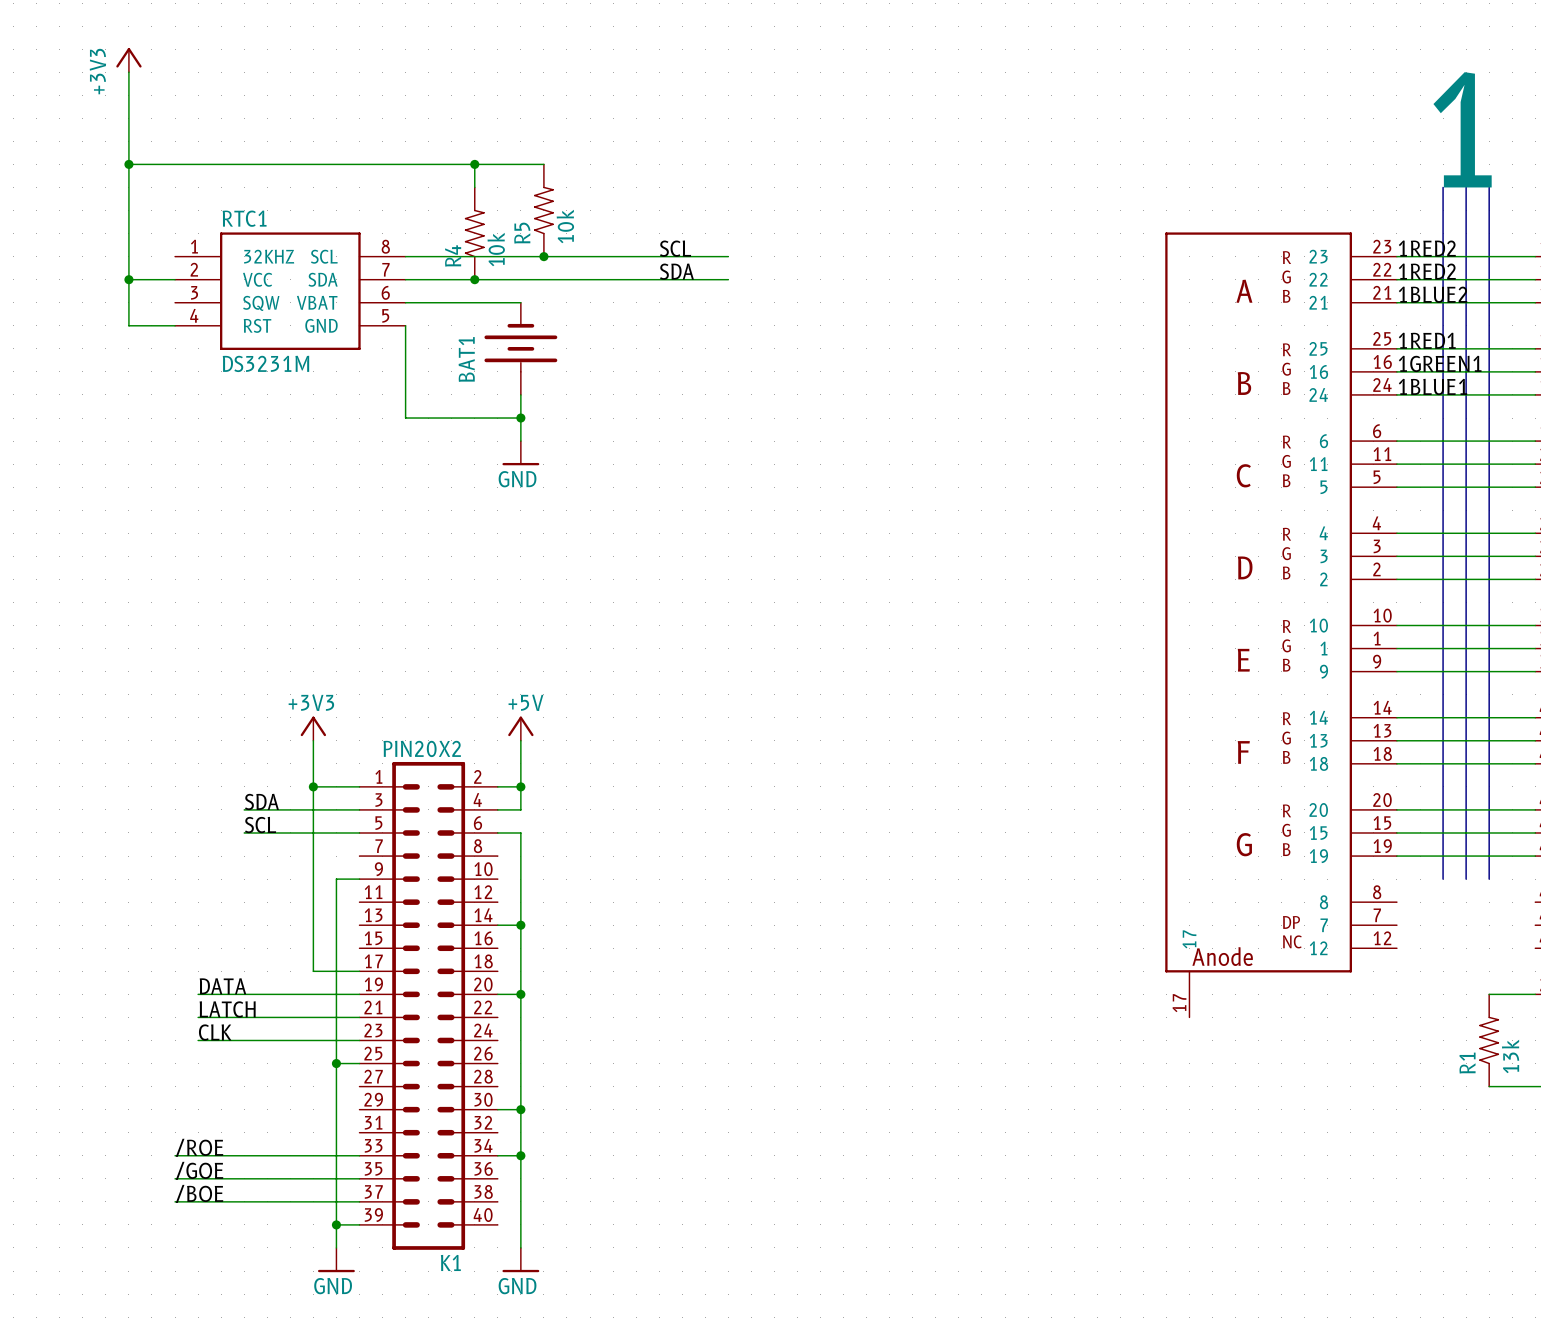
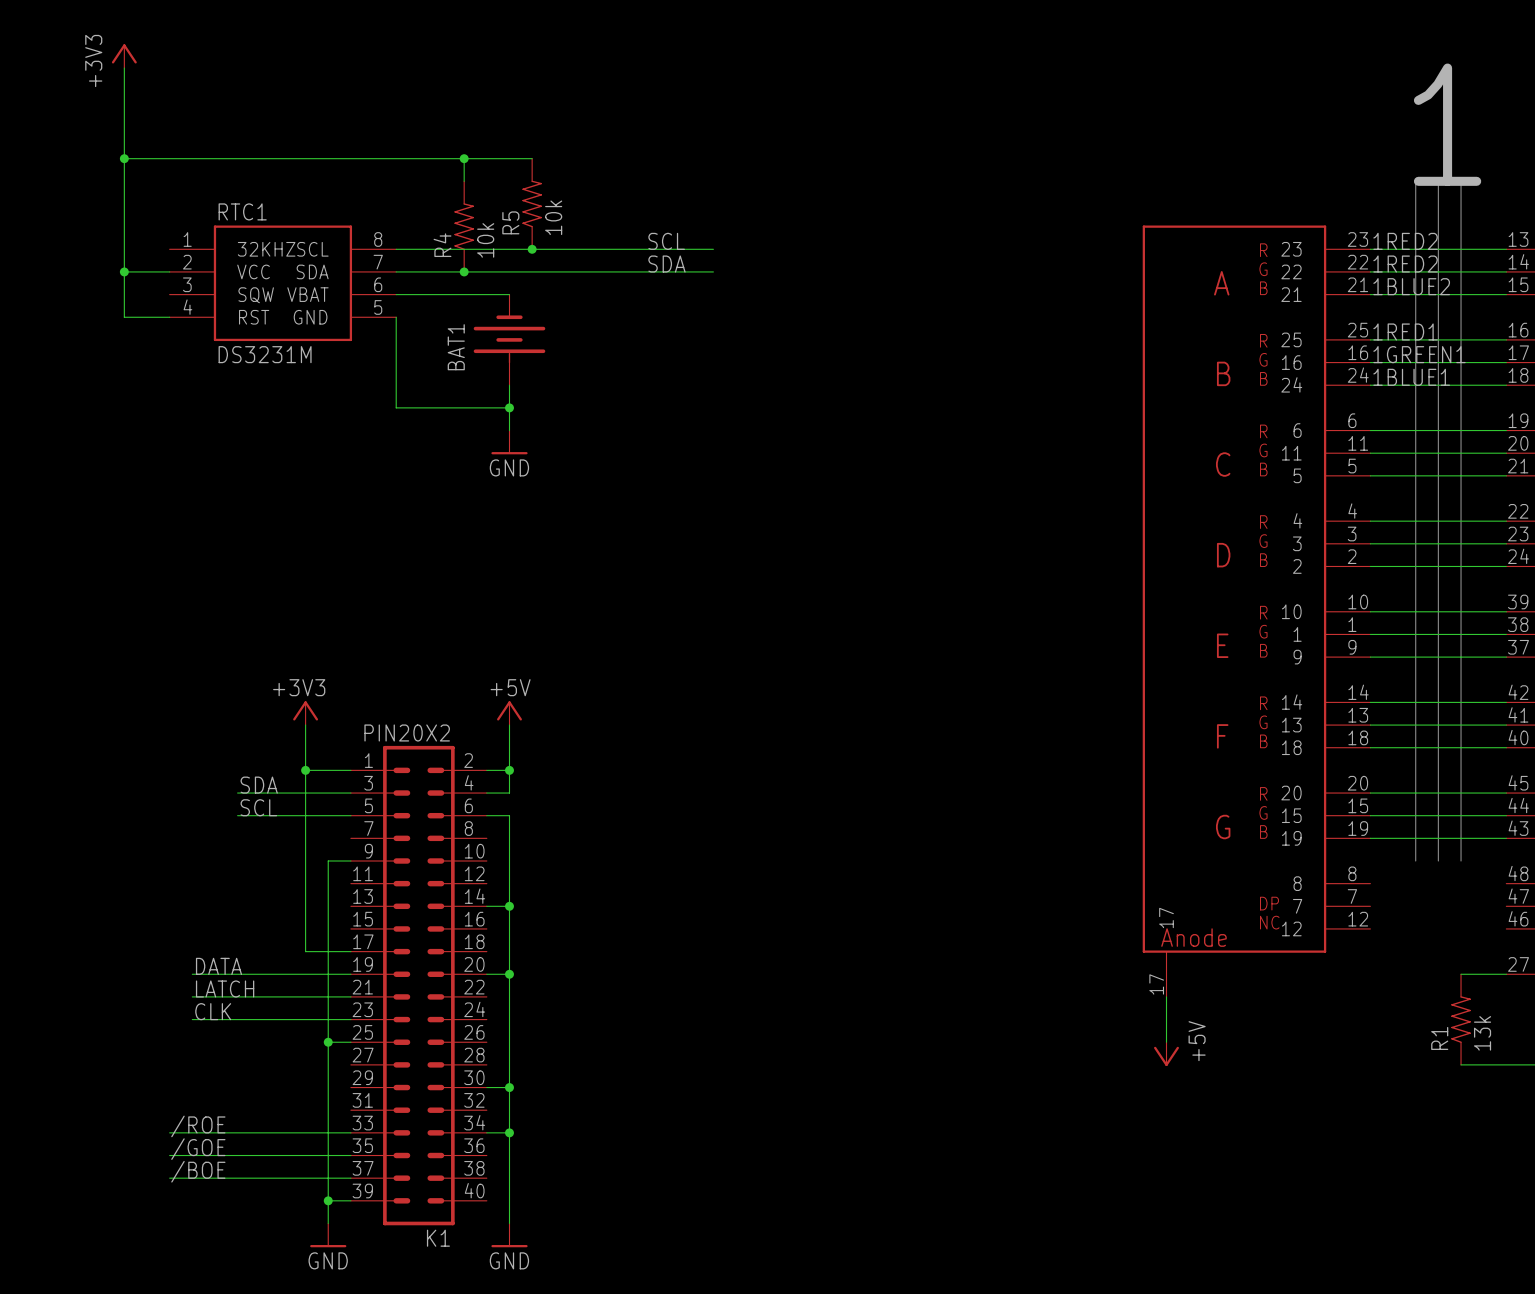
wire: none -> (1166, 996) (1166, 1042)
power symbol: none -> +5V (1166, 1054)

